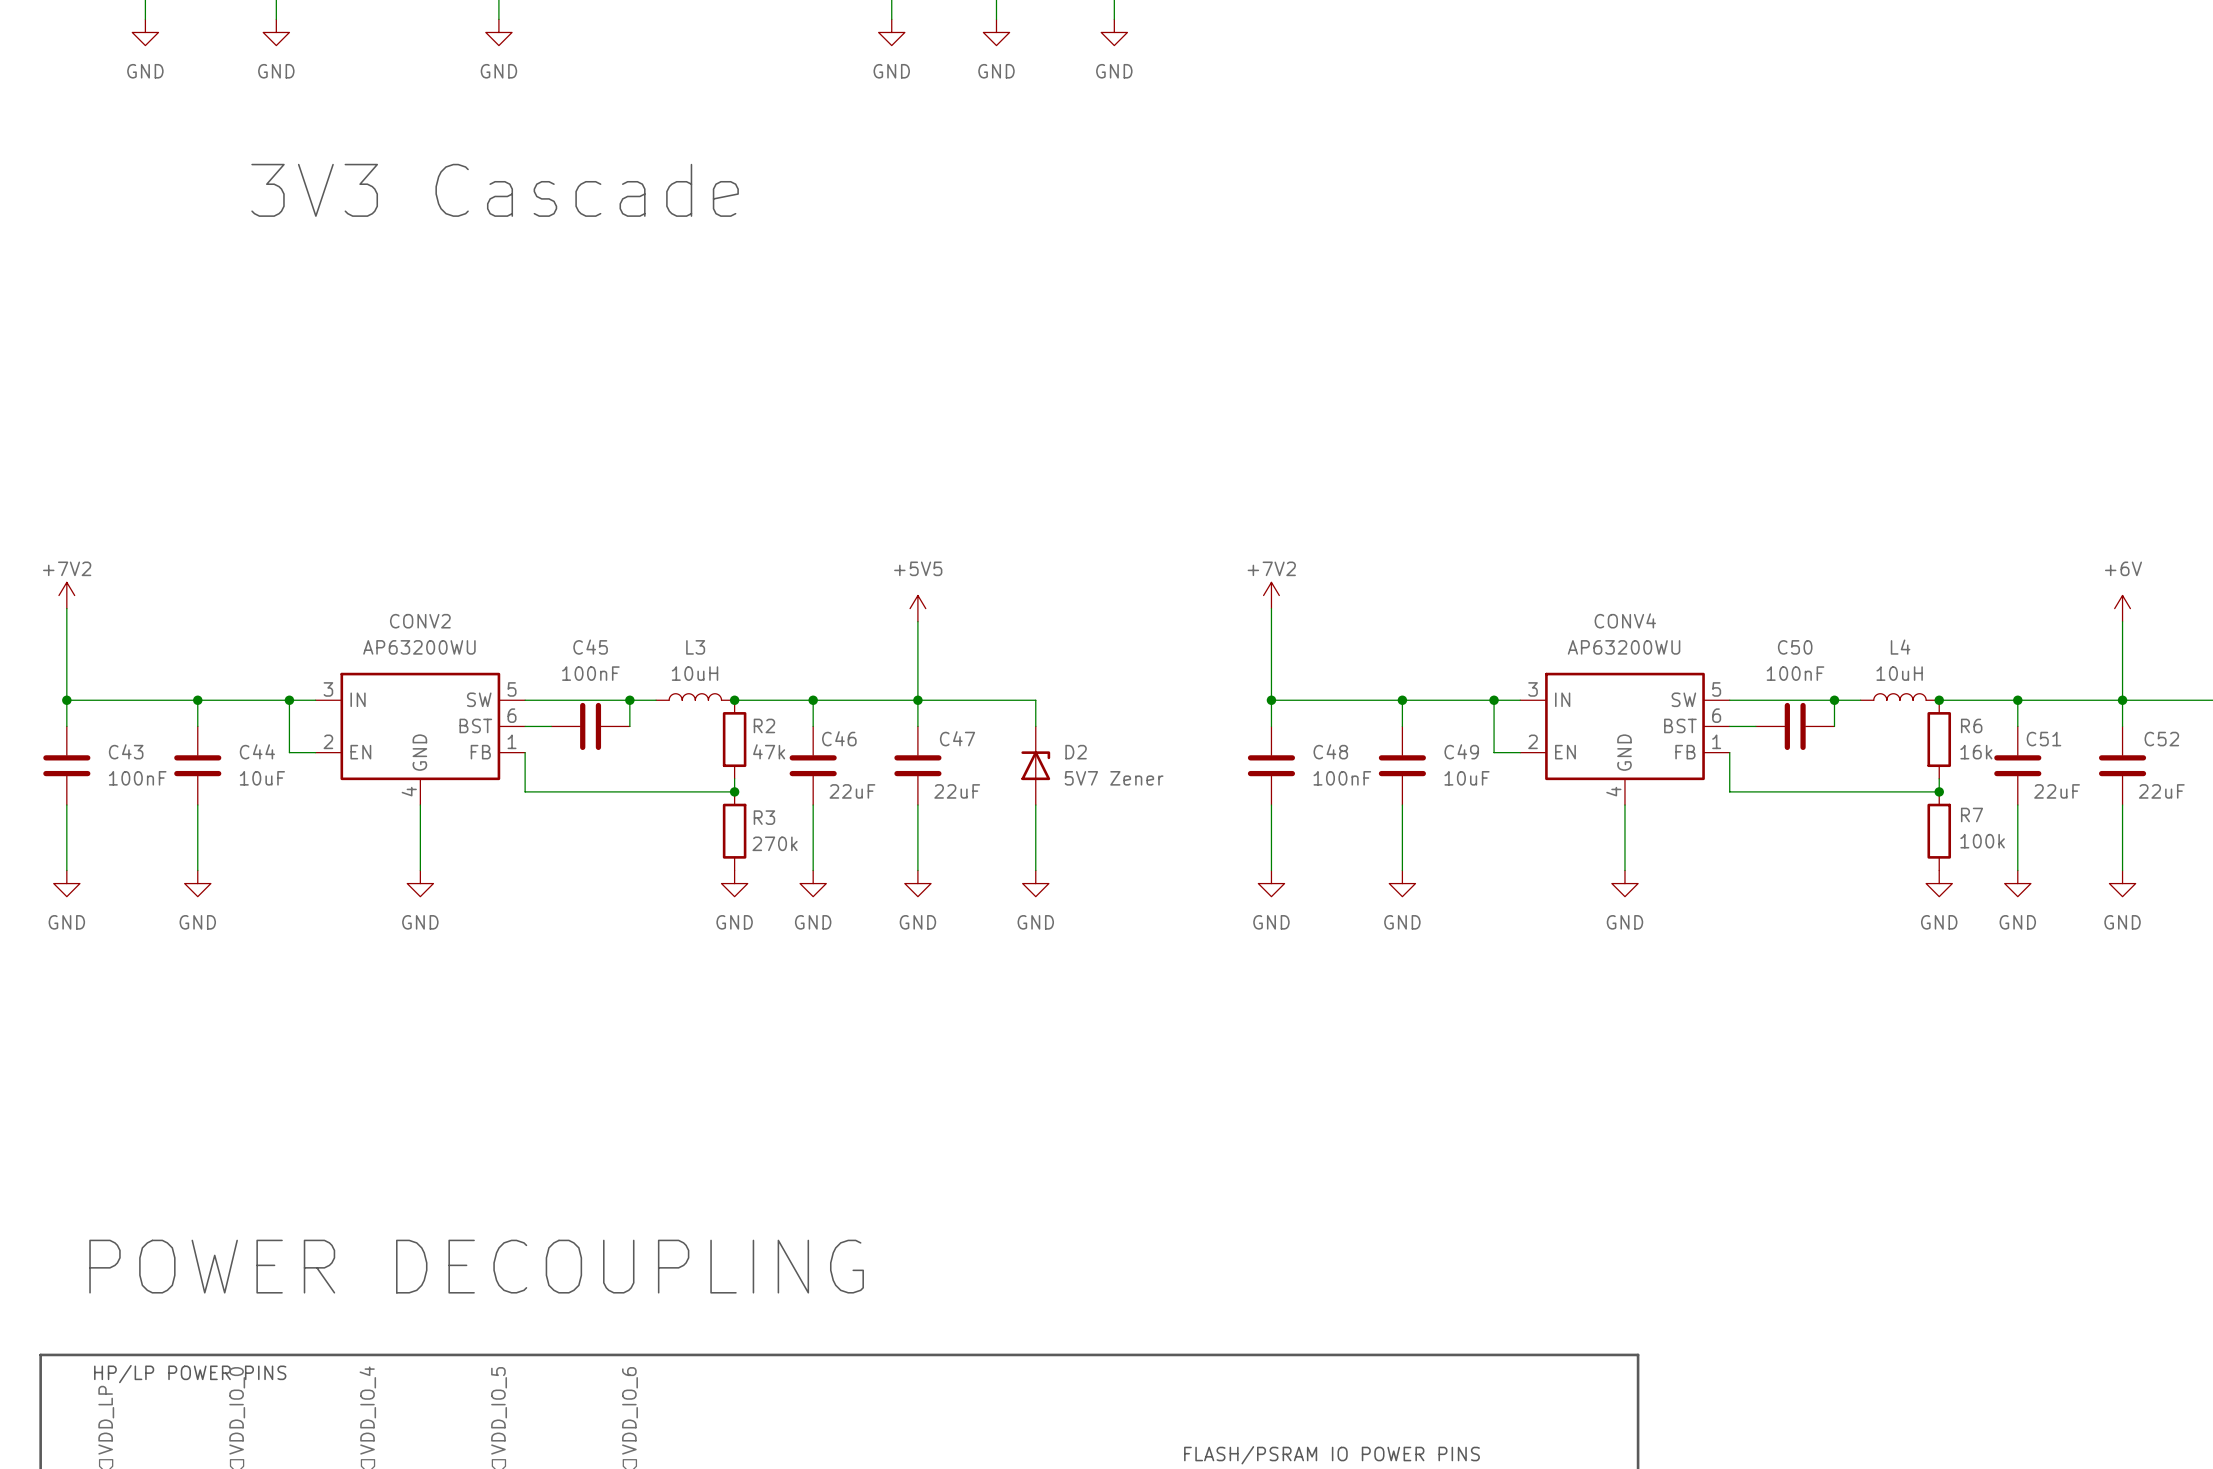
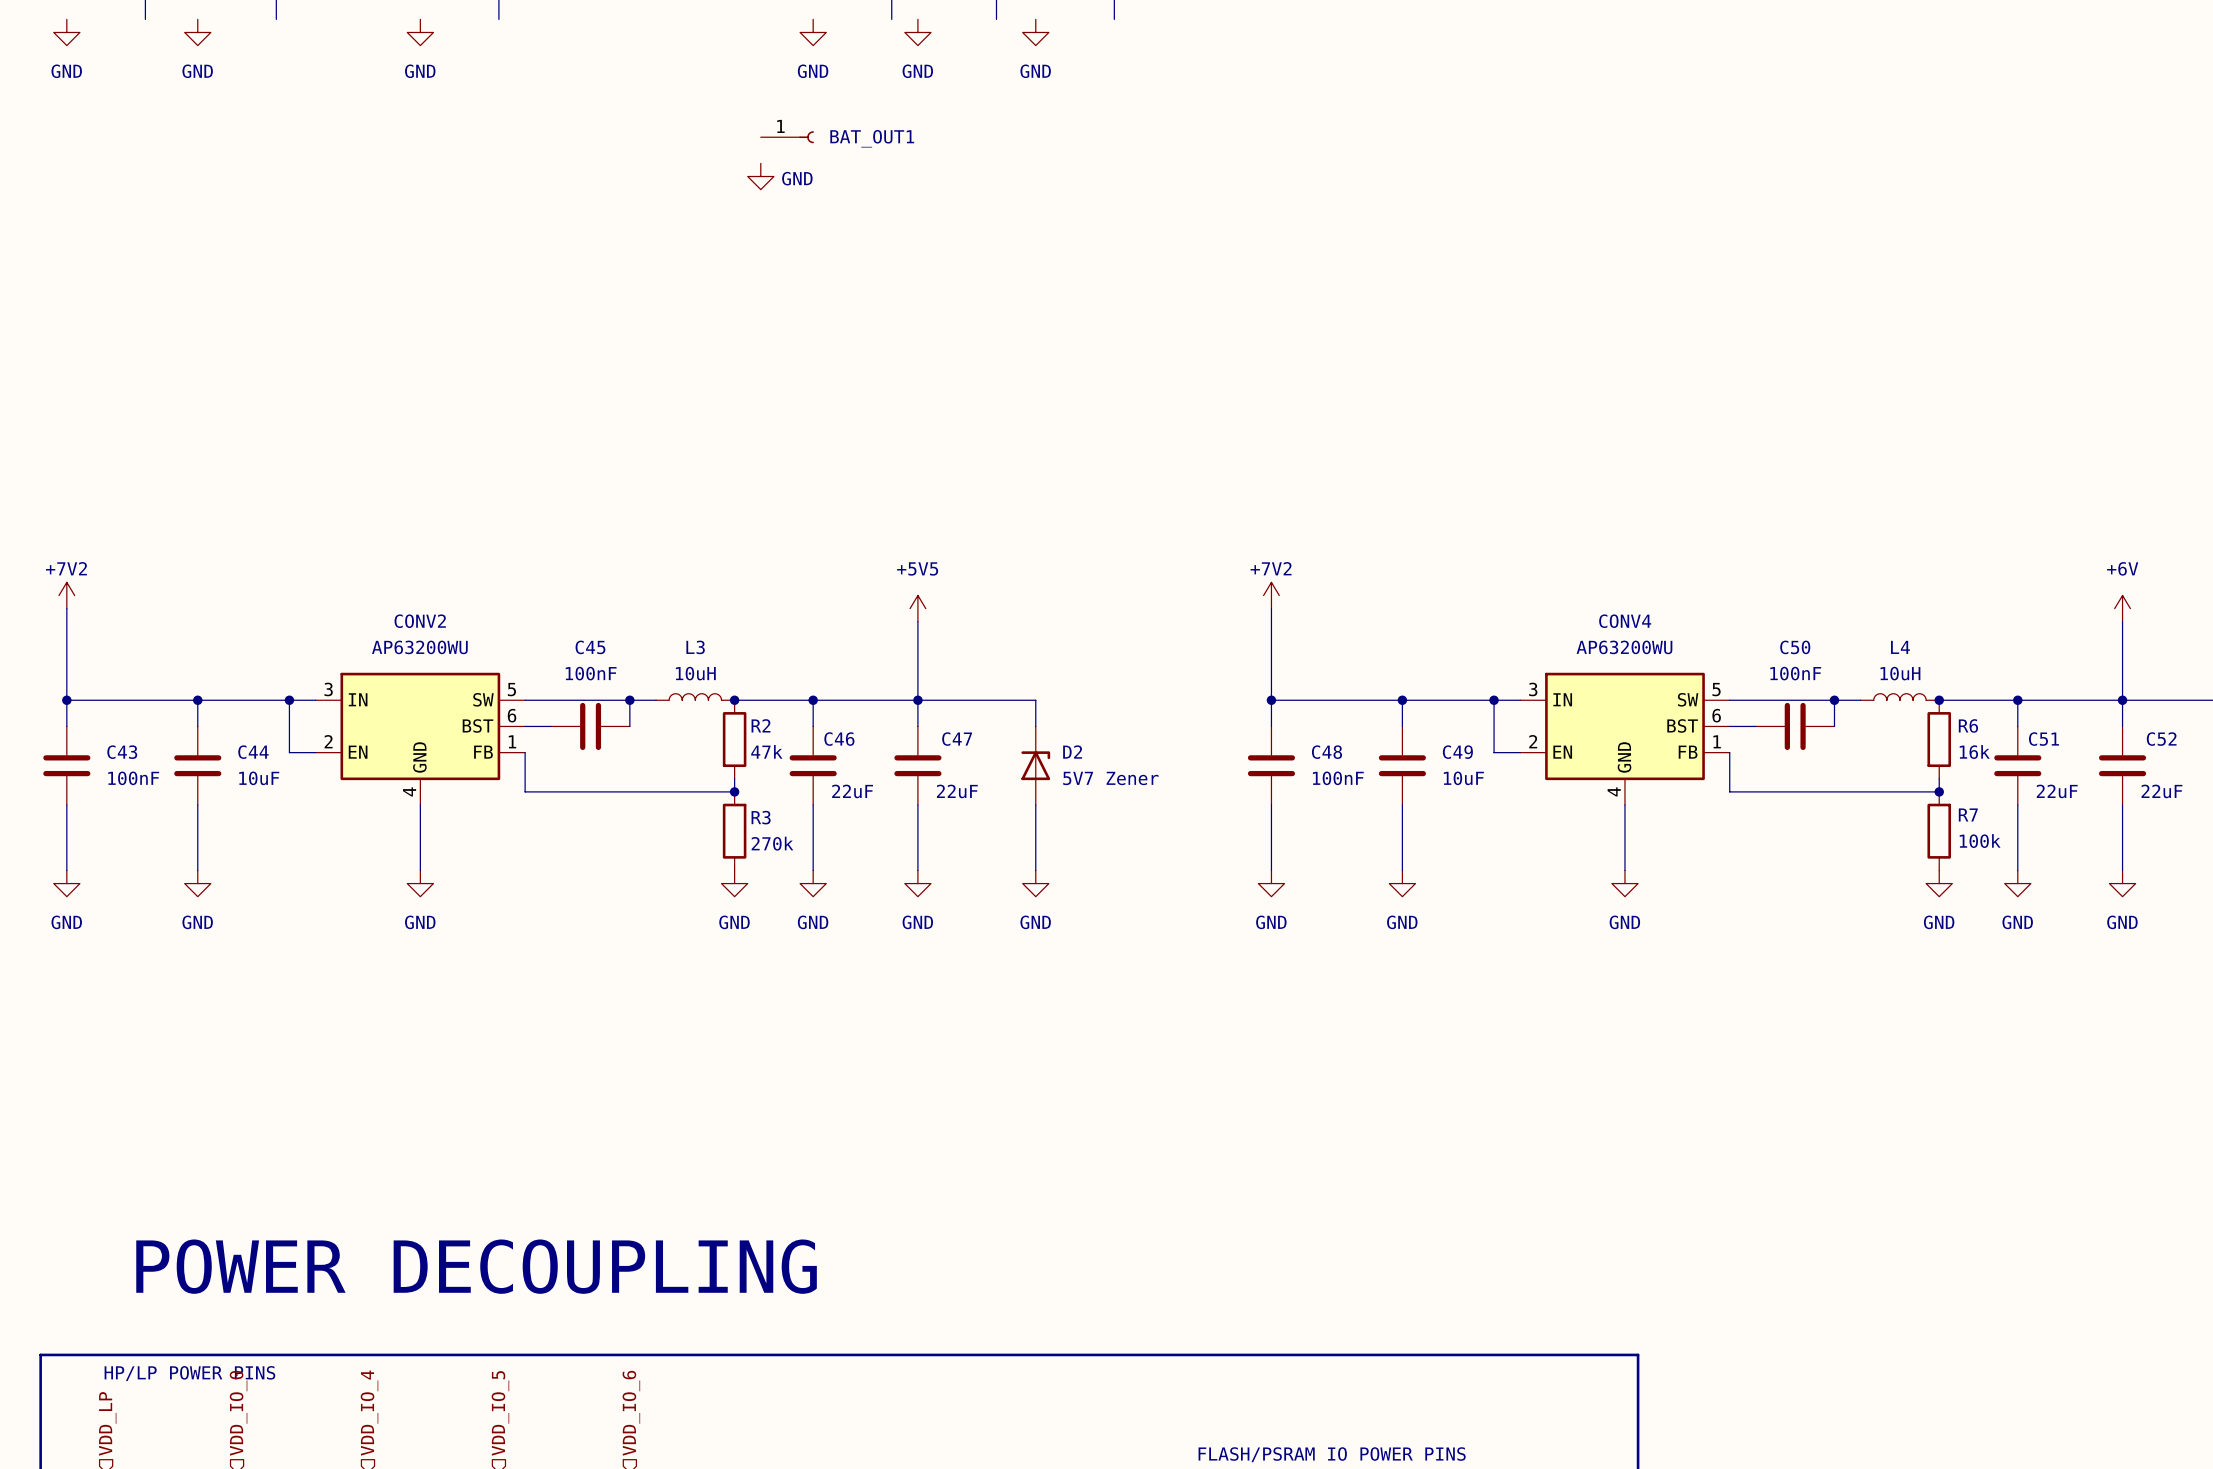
power symbol: none -> GND (66, 32)
power symbol: GND (145, 32) -> none
power symbol: none -> GND (197, 32)
power symbol: GND (276, 32) -> none
power symbol: none -> GND (420, 32)
power symbol: GND (498, 32) -> none
power symbol: none -> GND (813, 32)
power symbol position: GND (891, 32) -> GND (917, 32)
power symbol: GND (996, 32) -> none
power symbol: none -> GND (1035, 32)
power symbol: GND (1114, 32) -> none
BAT_OUT1: none -> (787, 137)
power symbol: none -> GND (760, 176)
text: 3V3 Cascade (495, 190) -> none

